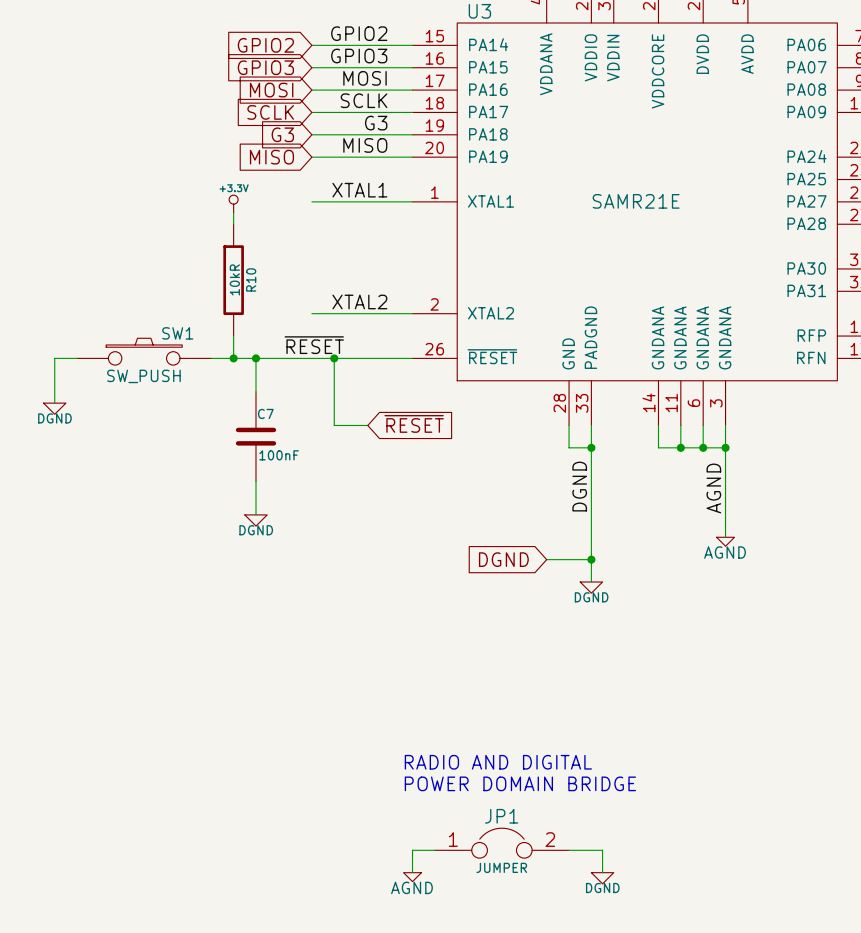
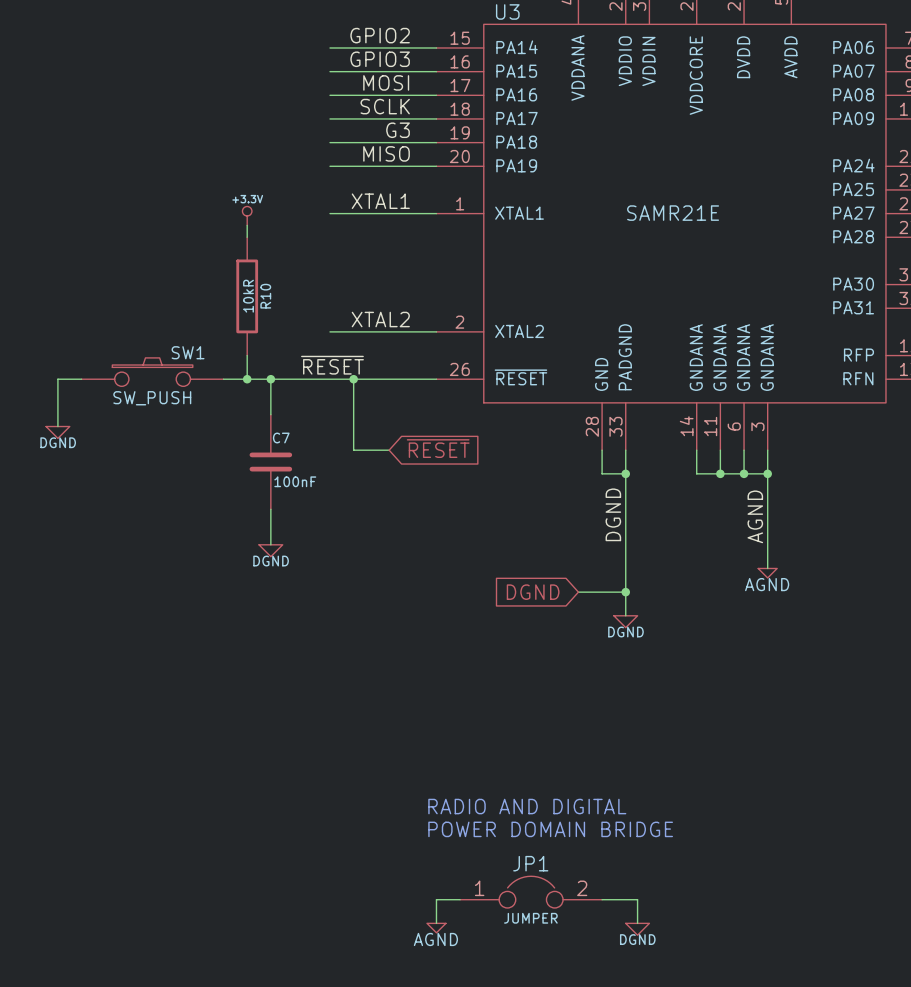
global label: GPIO2 (265, 45) -> none
global label: GPIO3 (265, 67) -> none
global label: MOSI (271, 90) -> none
global label: SCLK (270, 112) -> none
global label: G3 (282, 134) -> none
global label: MISO (271, 157) -> none

